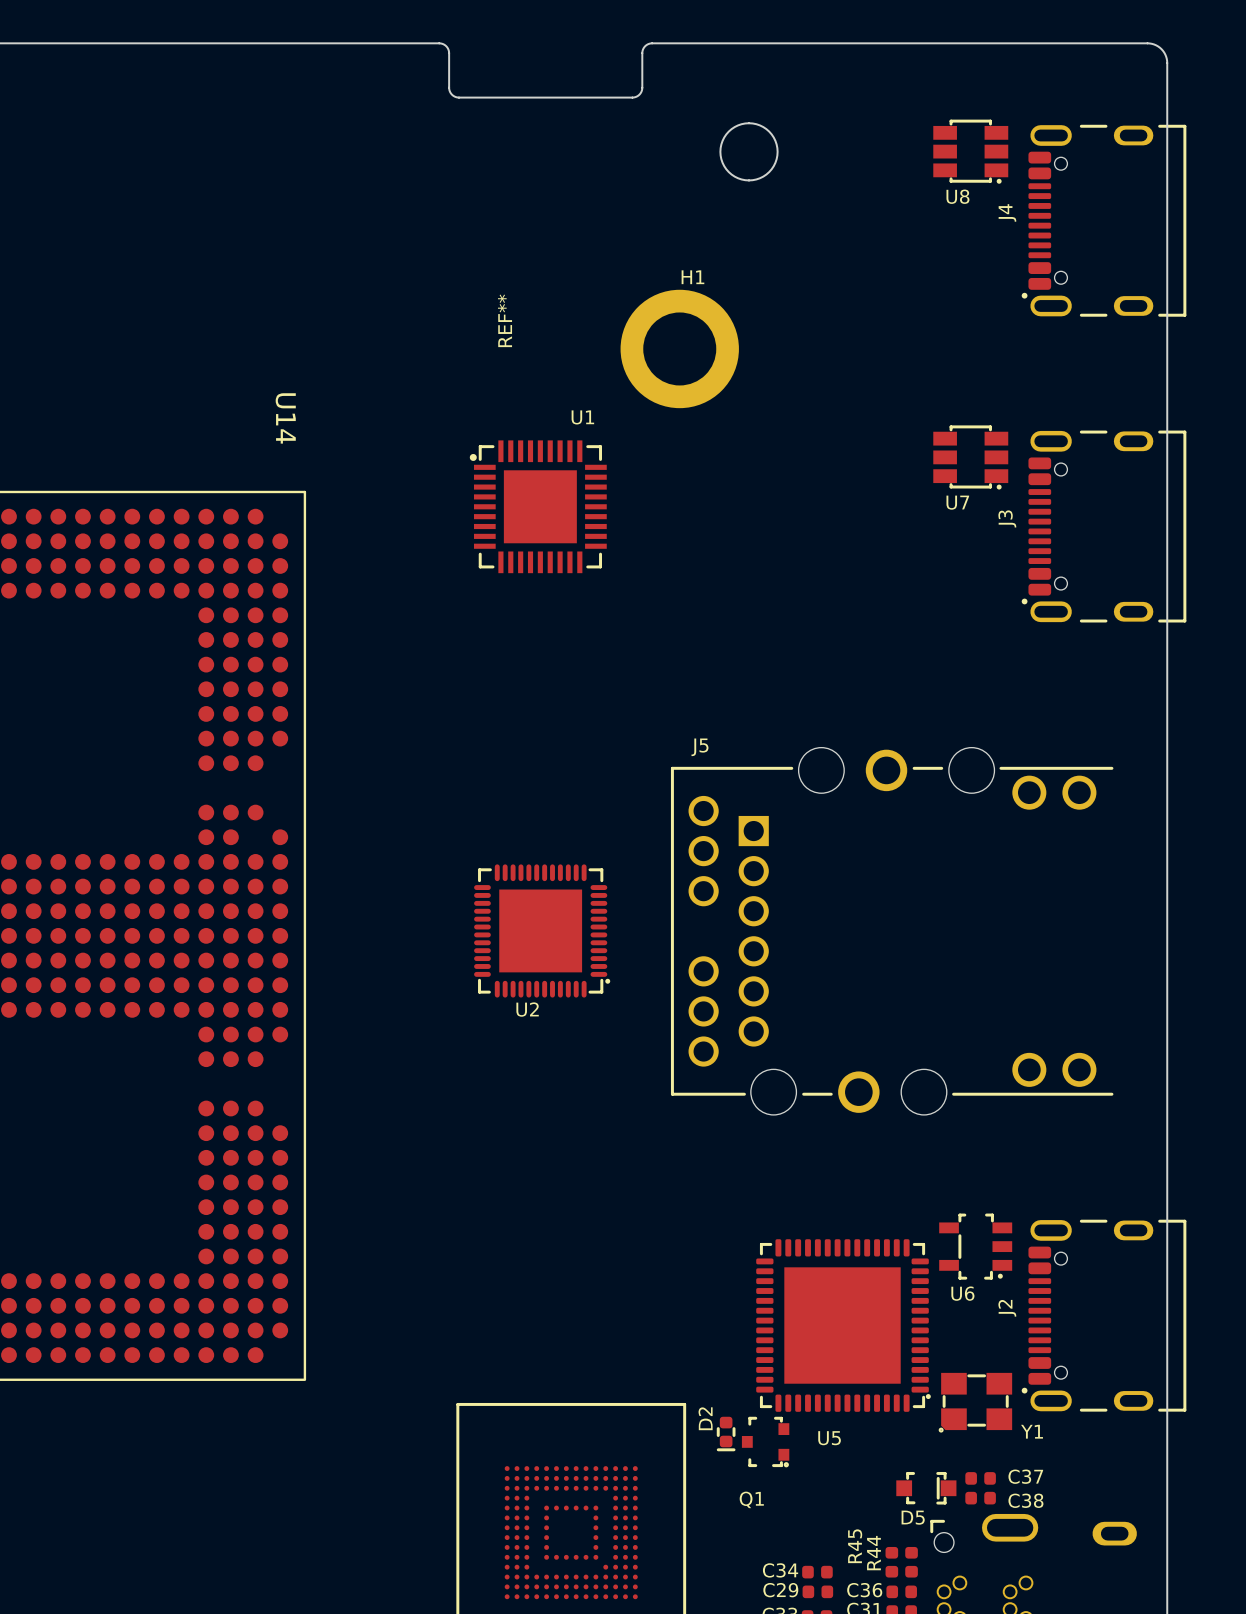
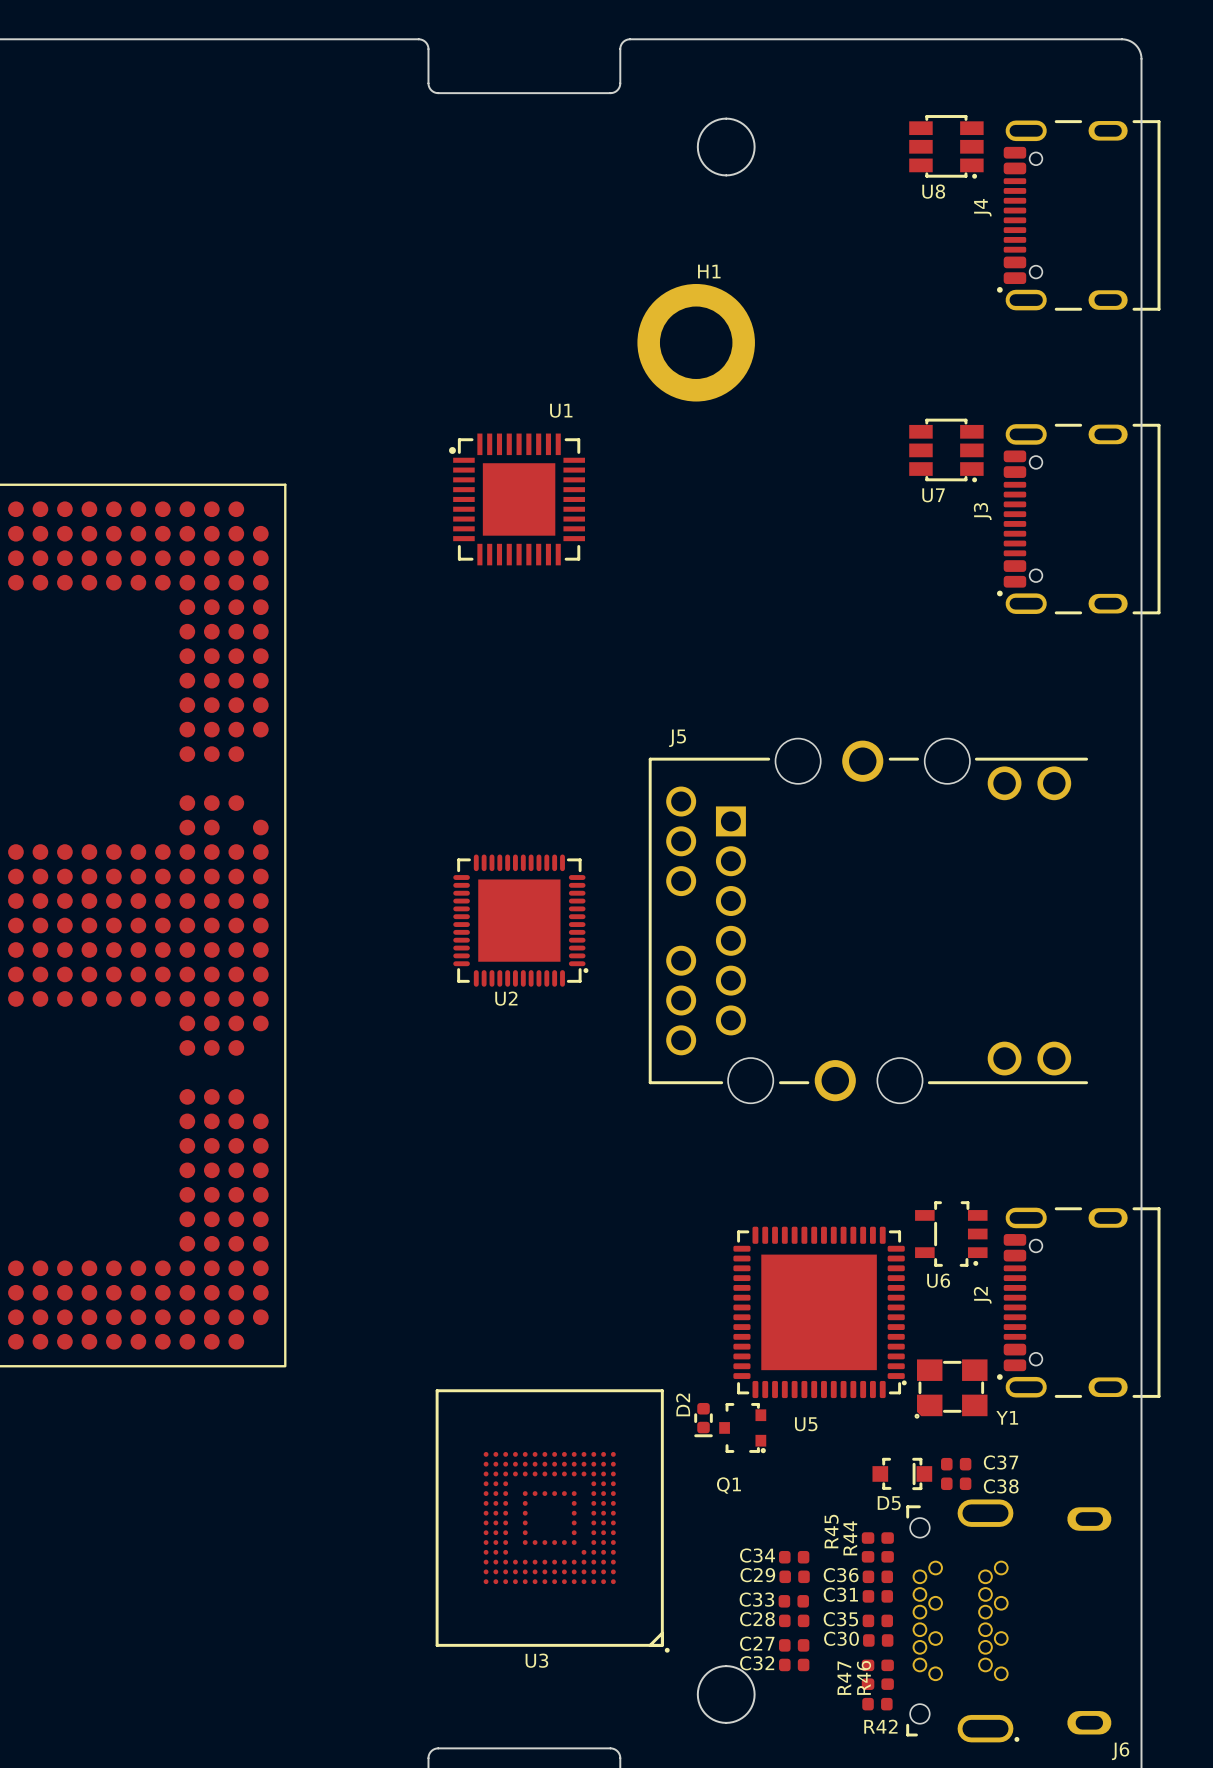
REF**: (505, 320) -> none
H1 position: (679, 348) -> (696, 342)
U14 name: U14 (285, 418) -> none

